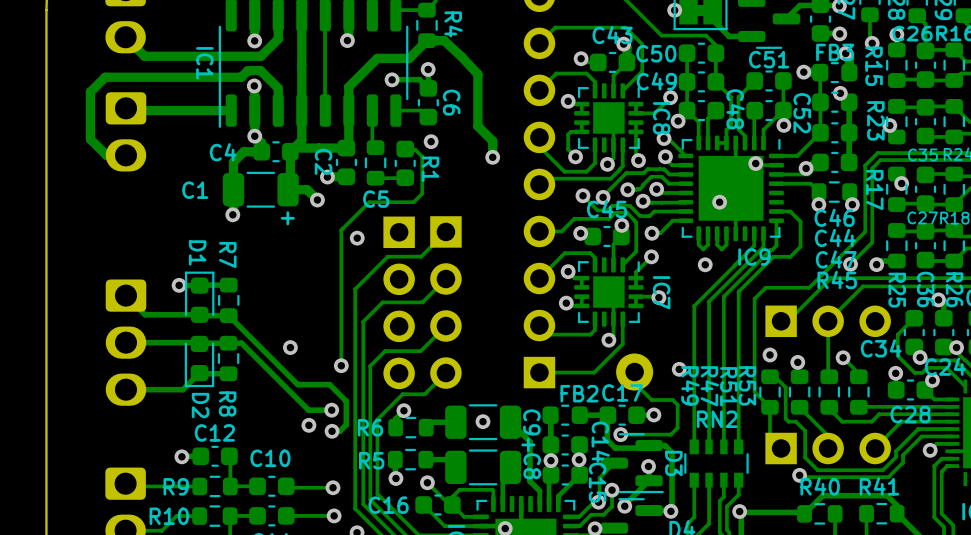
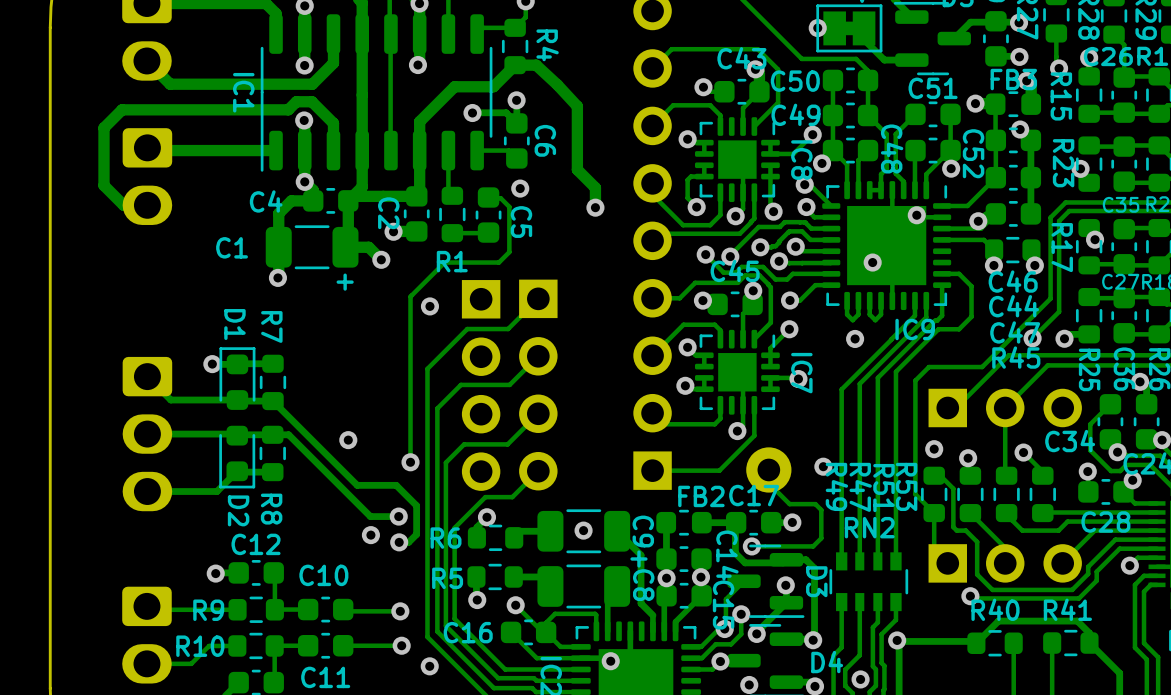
R1 name rotation: 0° (430, 169) -> 90° counterclockwise (452, 261)
R1 name position: R1 (430, 169) -> R1 (452, 261)
C5 name rotation: 0° (376, 199) -> 90° clockwise (521, 222)
C5 name position: C5 (376, 199) -> C5 (521, 222)

